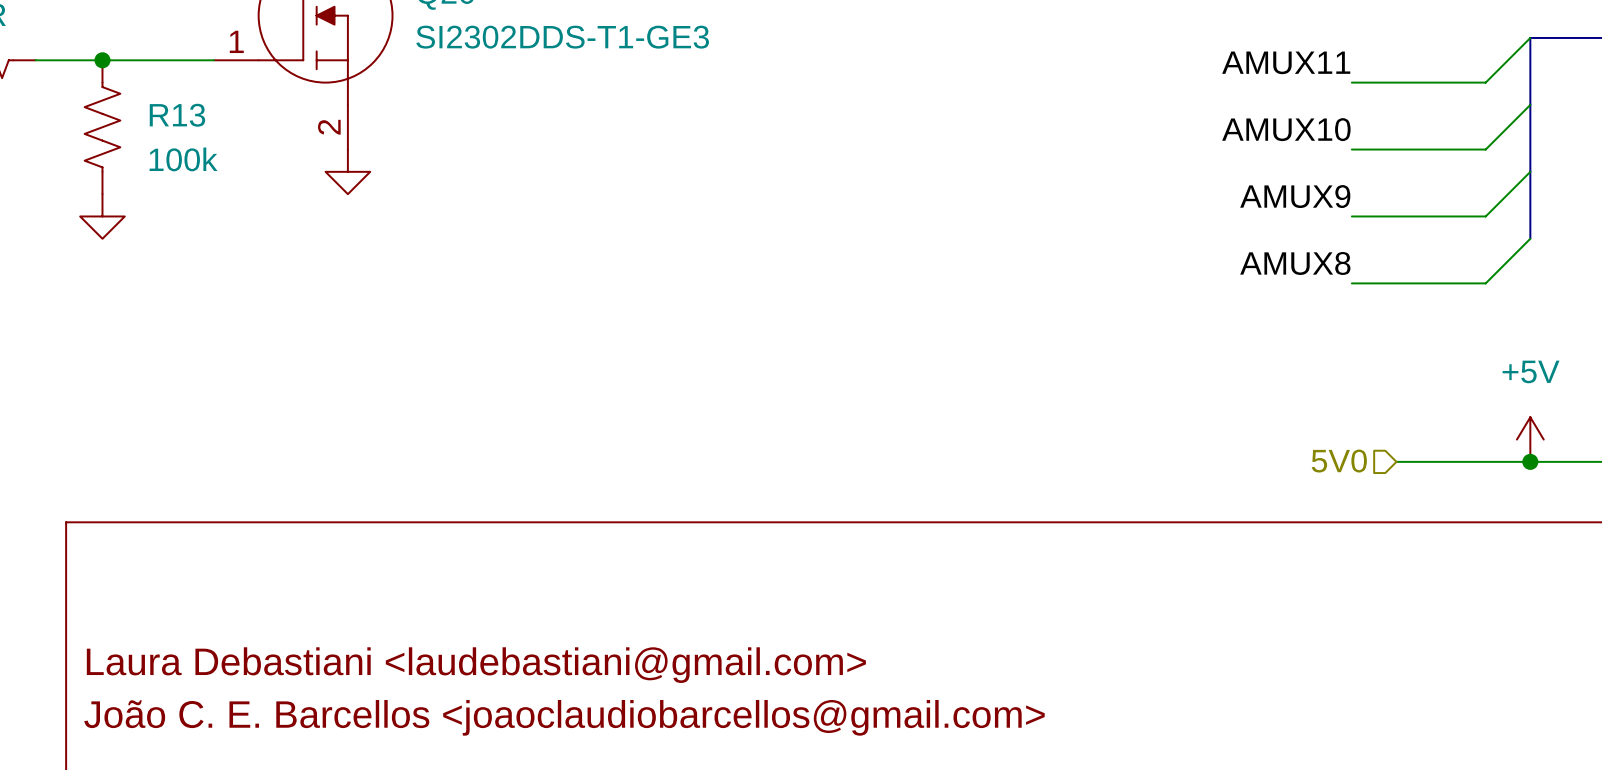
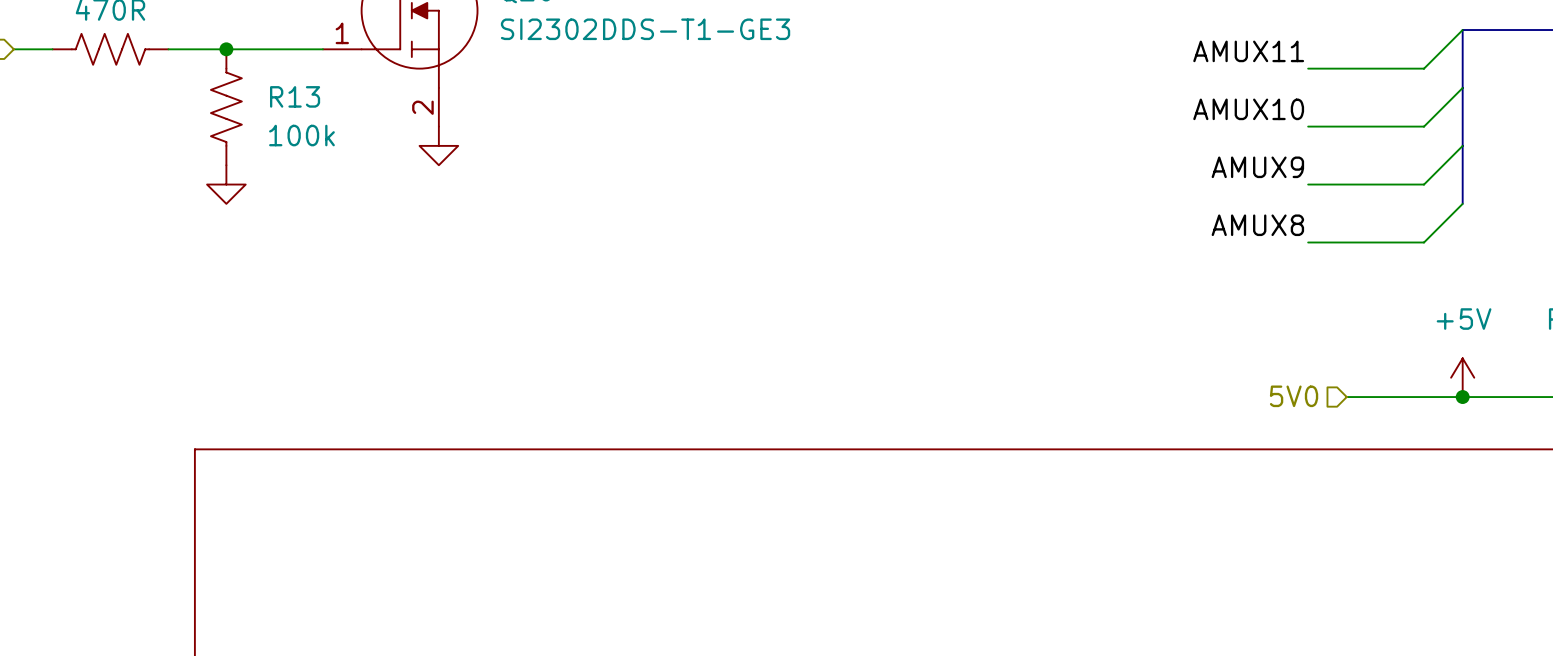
title block: Laura Debastiani <laudebastiani@gmail.com> (476, 665) -> none
title block: João C. E. Barcellos <joaoclaudiobarcellos@gmail.com> (564, 717) -> none

